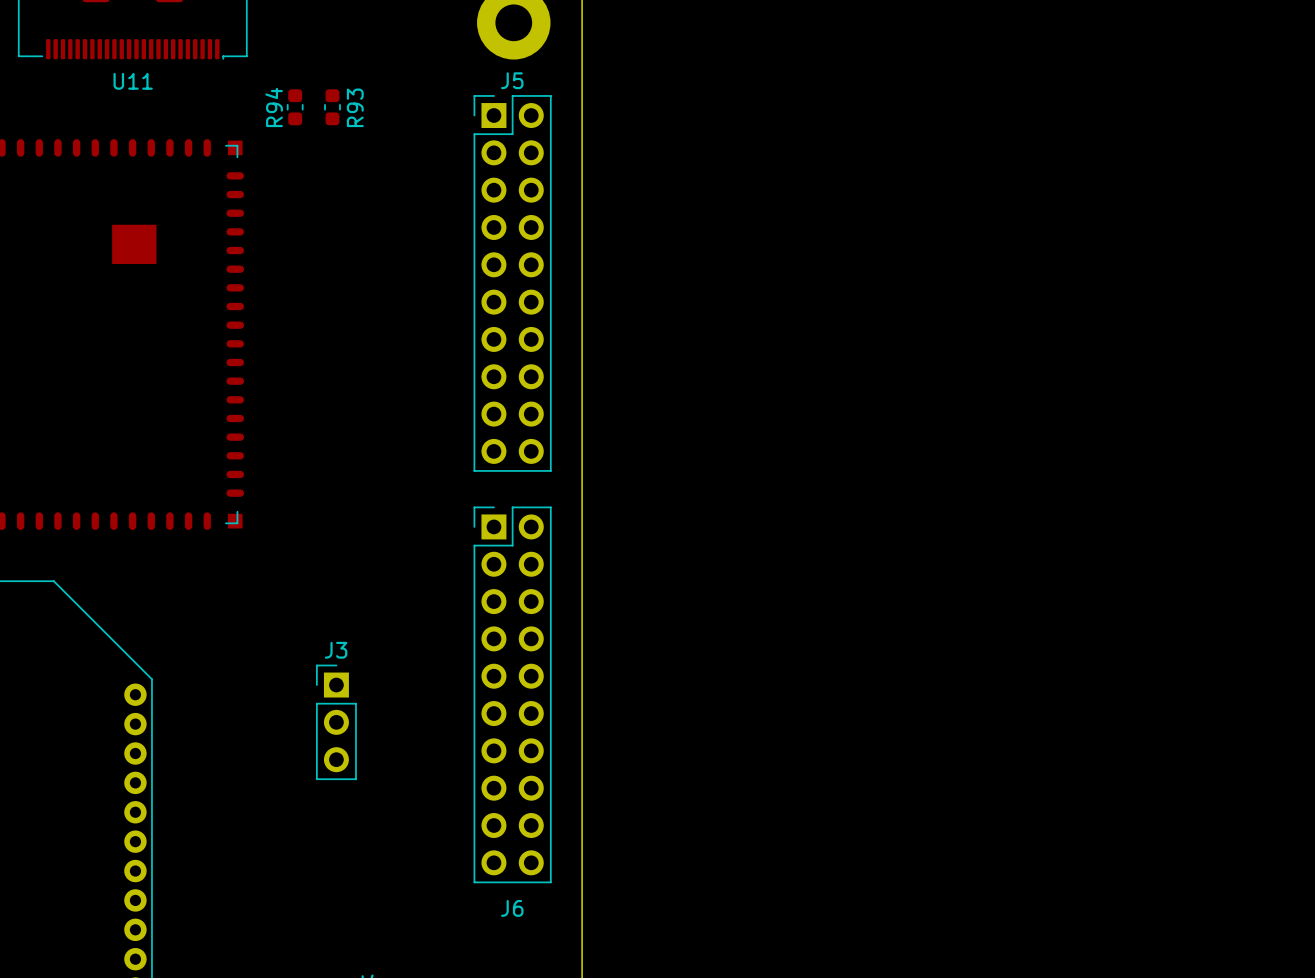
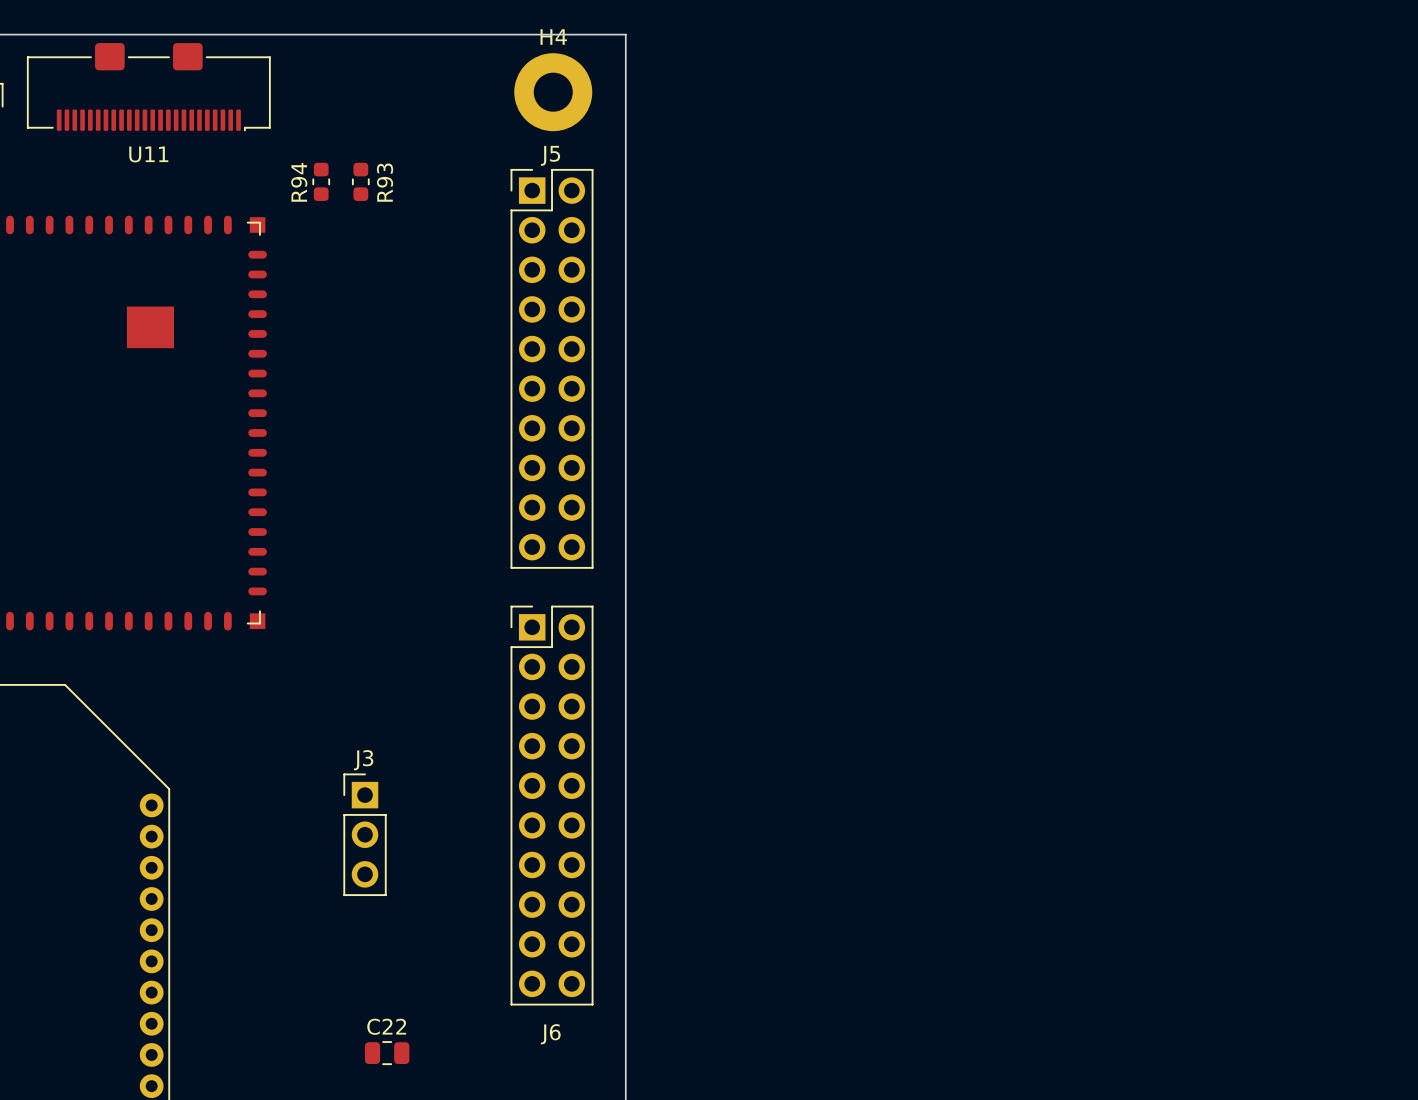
C22: none -> (387, 1053)

